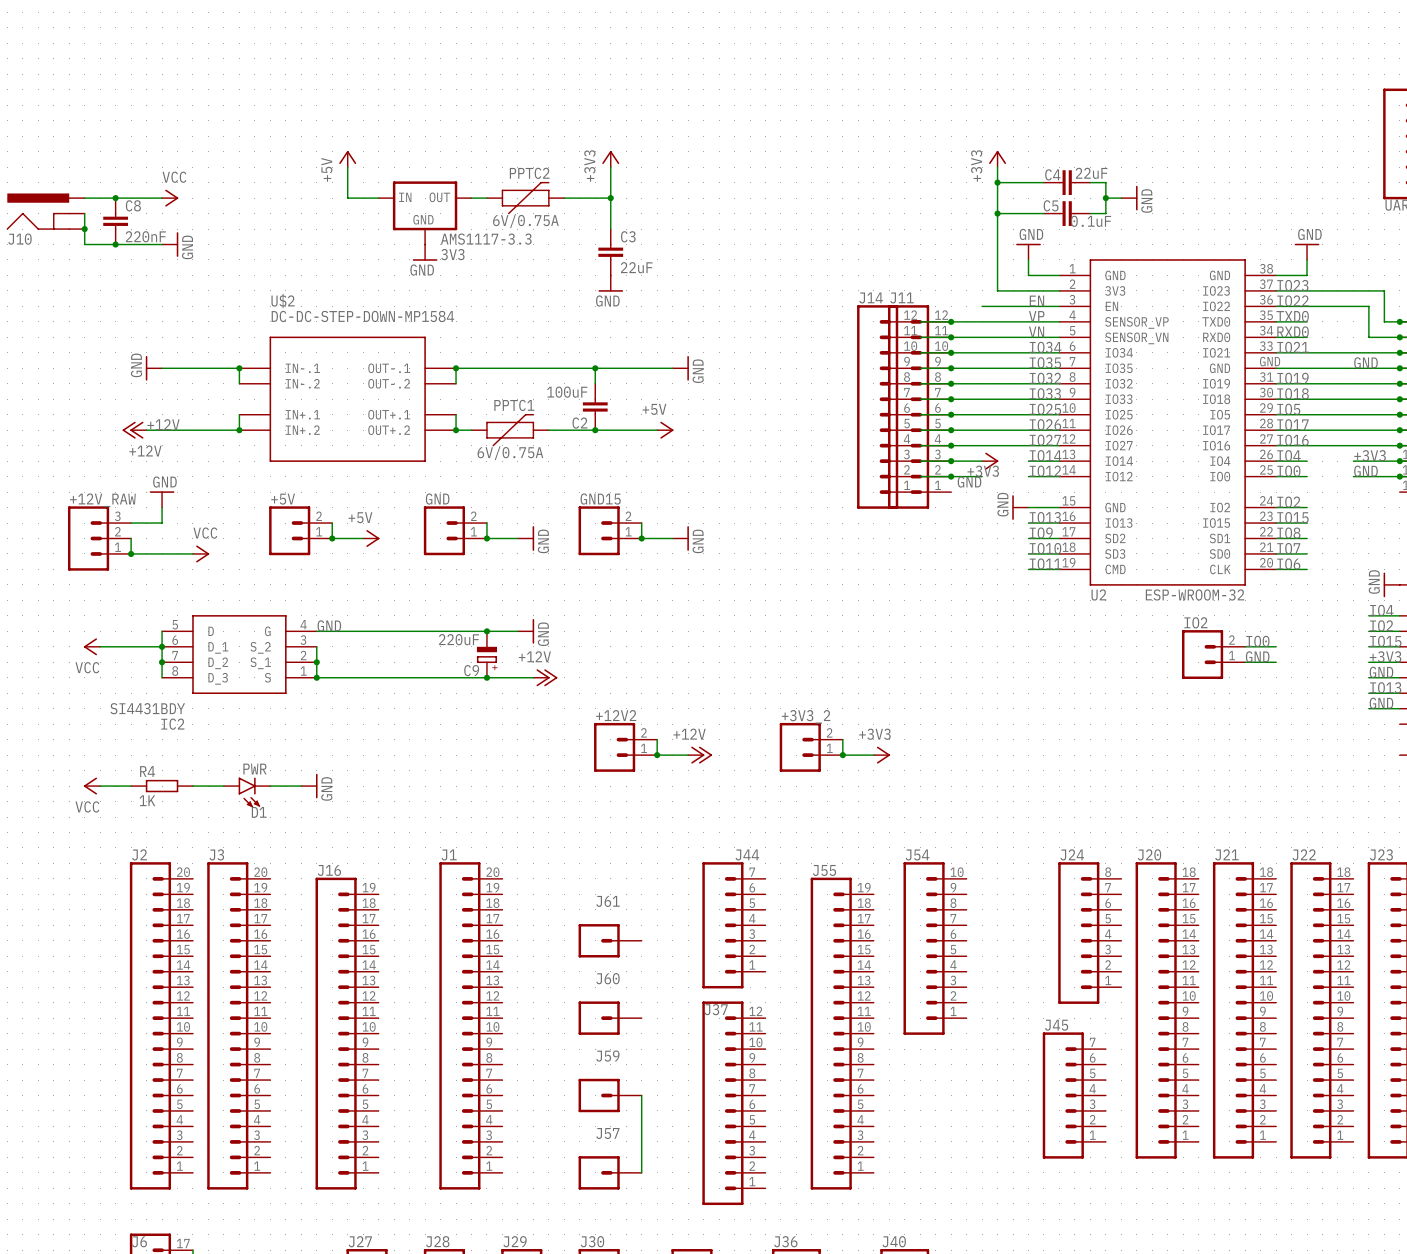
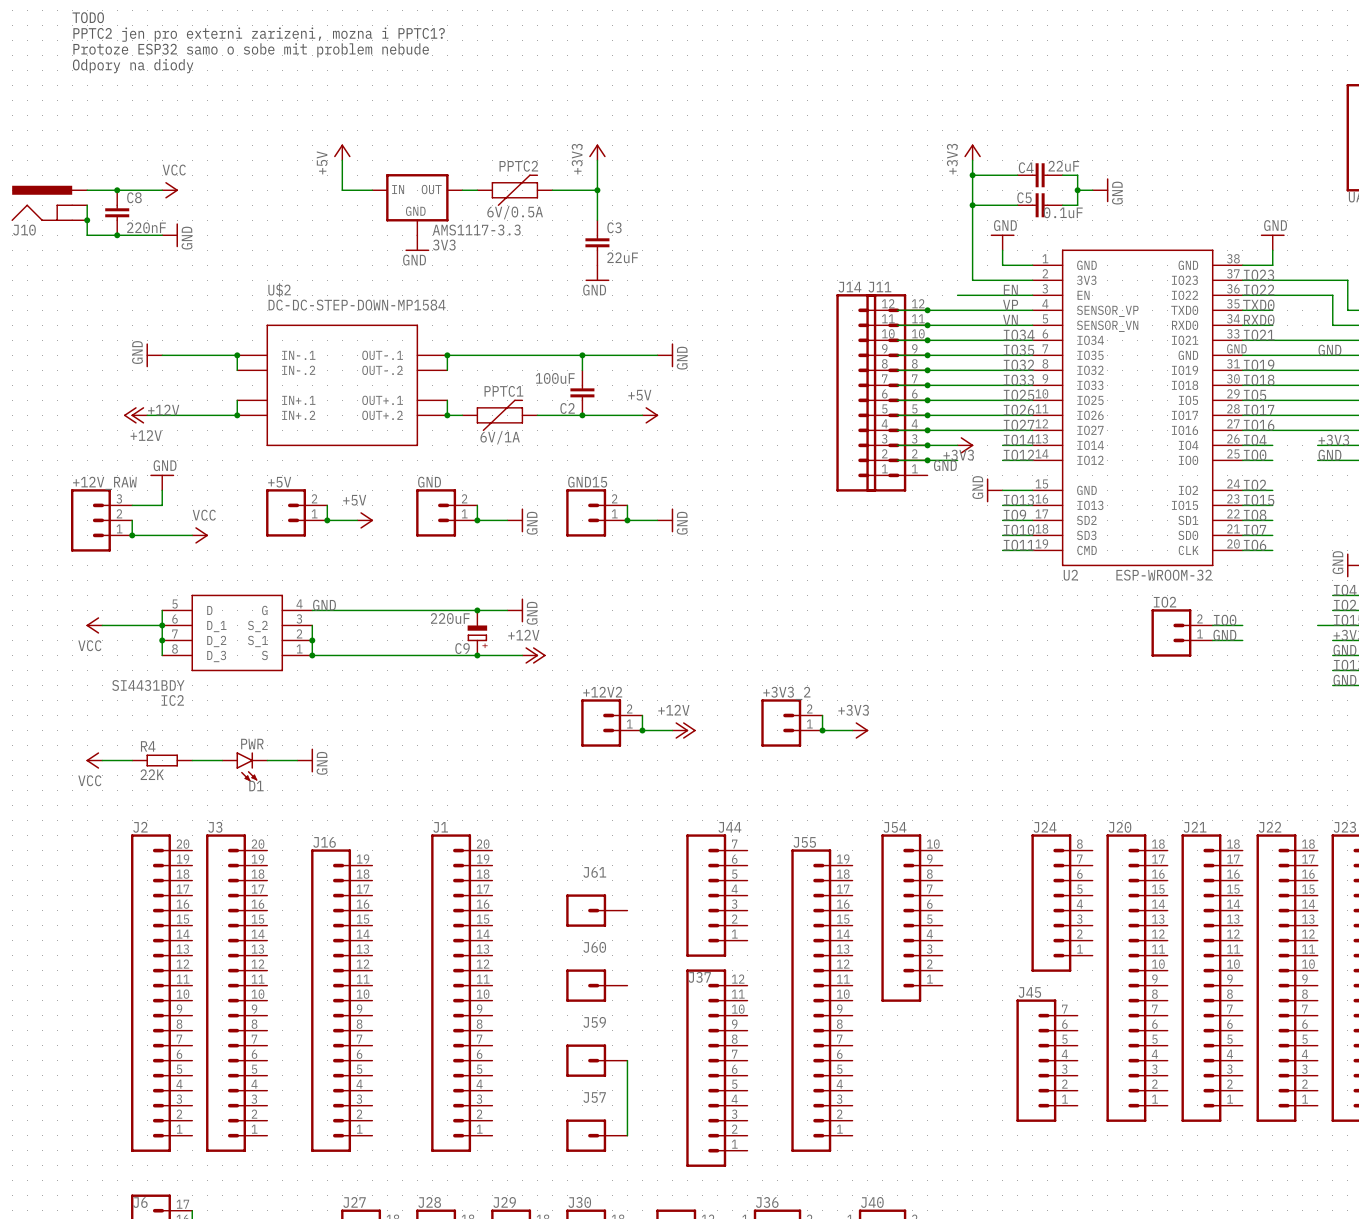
text: none -> TODO (88, 17)
text: none -> PPTC2 jen pro externi zarizeni, mozna i PPTC1? (259, 34)
text: none -> Protoze ESP32 samo o sobe mit problem nebude (251, 50)
text: none -> Odpory na diody (133, 66)
PPTC2 value: 6V/0.75A (525, 221) -> 6V/0.5A (515, 212)
PPTC1 value: 6V/0.75A (510, 453) -> 6V/1A (500, 437)
wire: none -> (1317, 625) (1332, 625)
R4 value: 1K (147, 800) -> 22K (152, 774)

